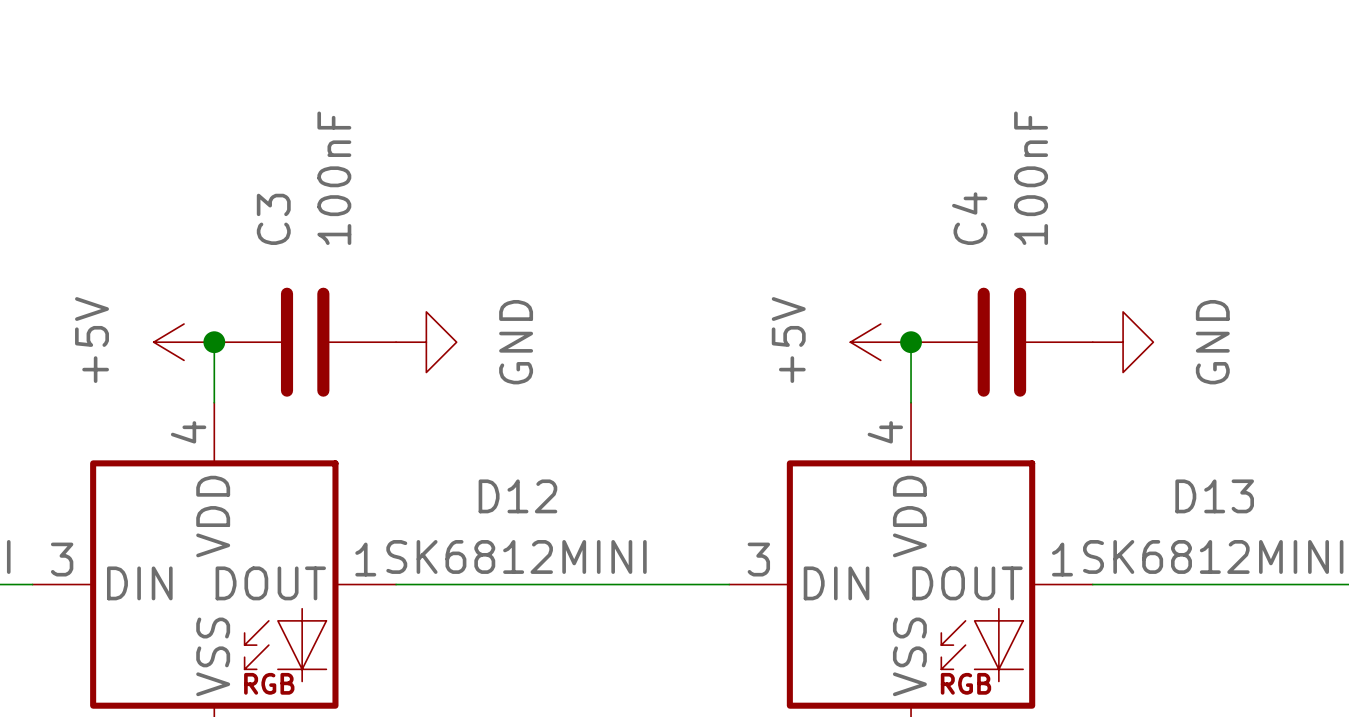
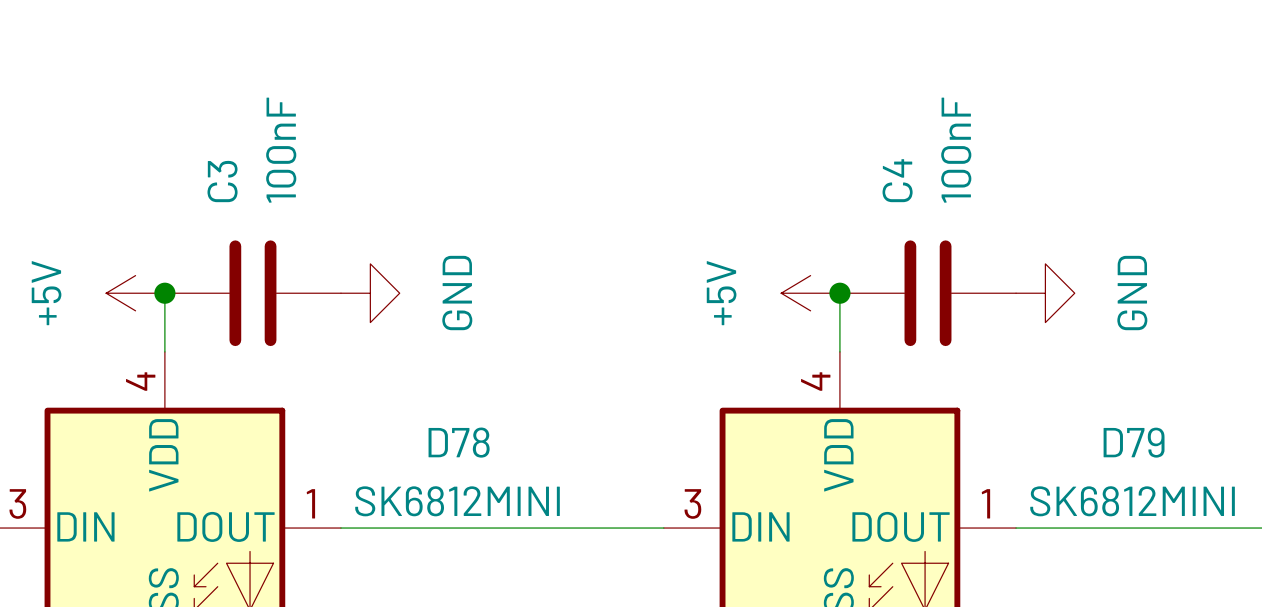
D12 name: D12 (517, 496) -> D78 (459, 442)
D13 name: D13 (1214, 496) -> D79 (1134, 442)

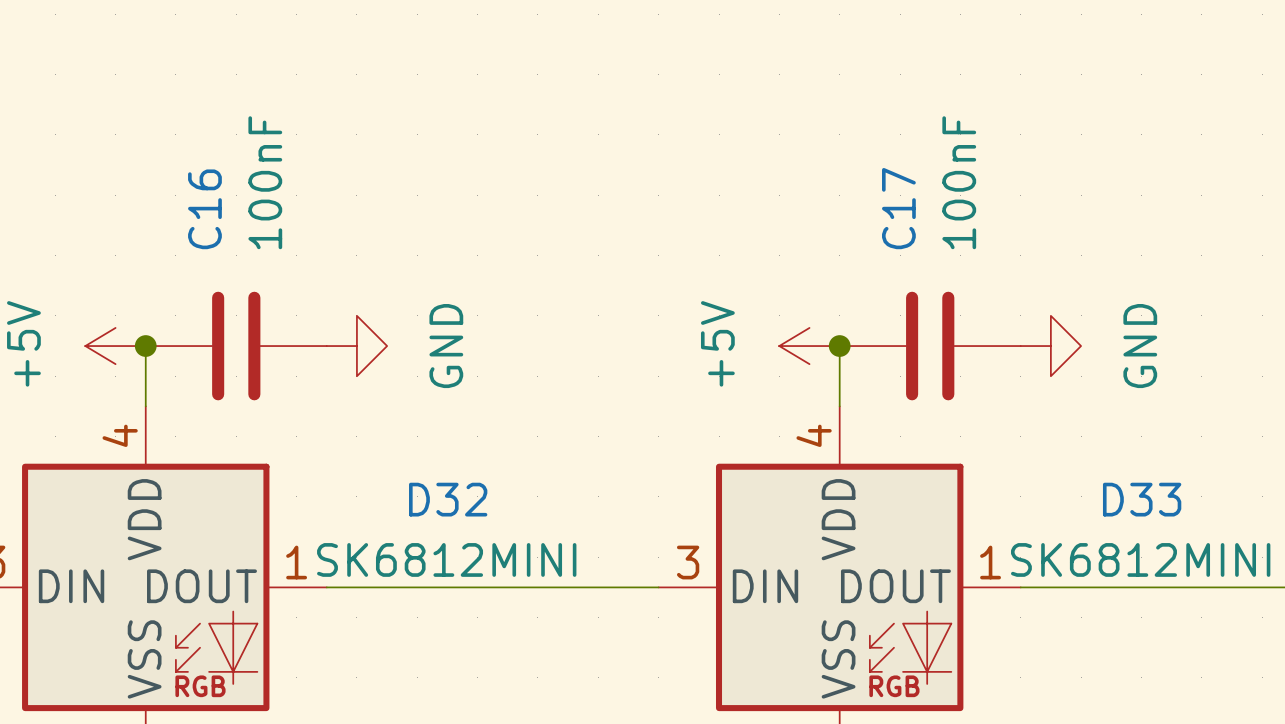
C4 name: C4 (897, 180) -> C17 (898, 208)
C3 name: C3 (222, 181) -> C16 (204, 209)
D78 name: D78 (459, 442) -> D32 (448, 499)
D79 name: D79 (1134, 442) -> D33 (1142, 499)

